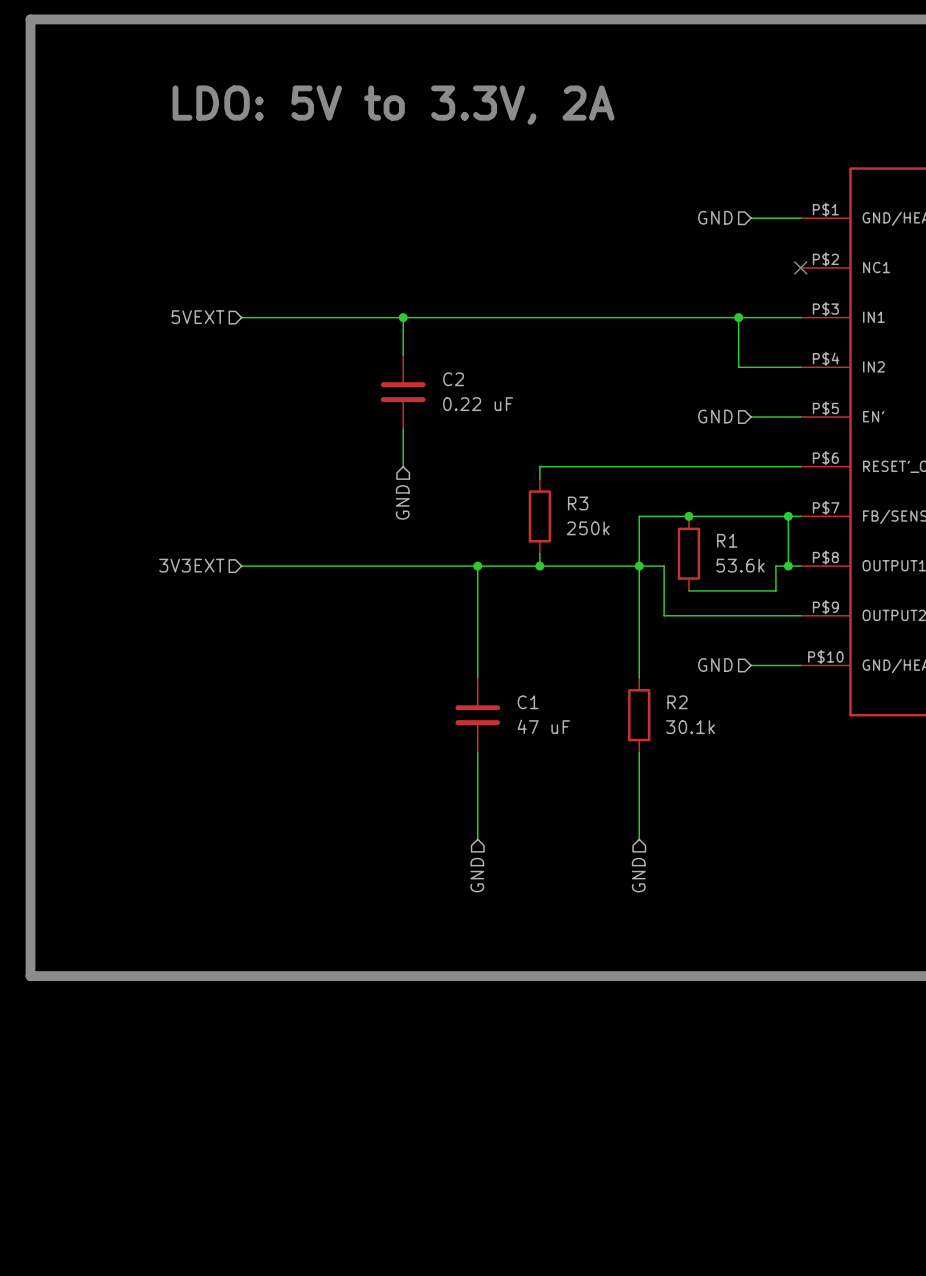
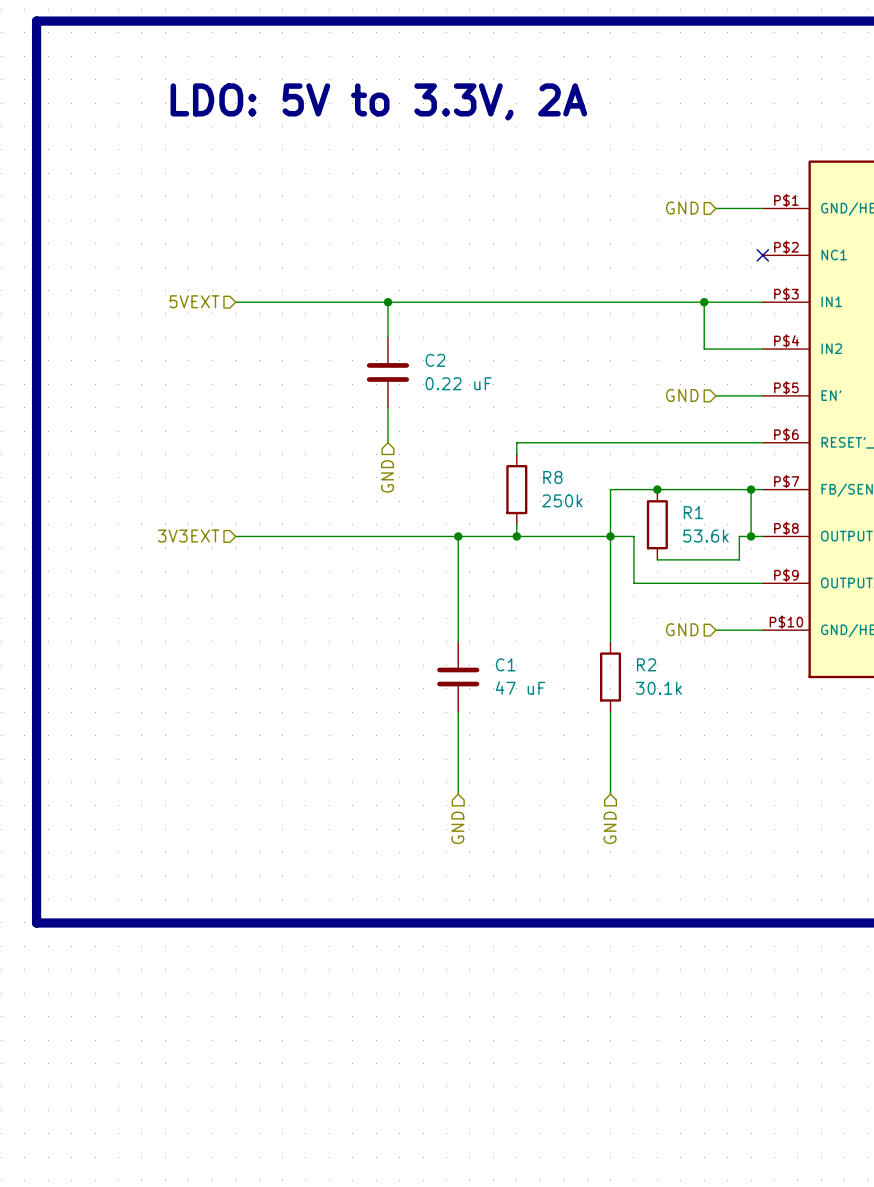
R3 name: R3 (578, 503) -> R8 (552, 477)

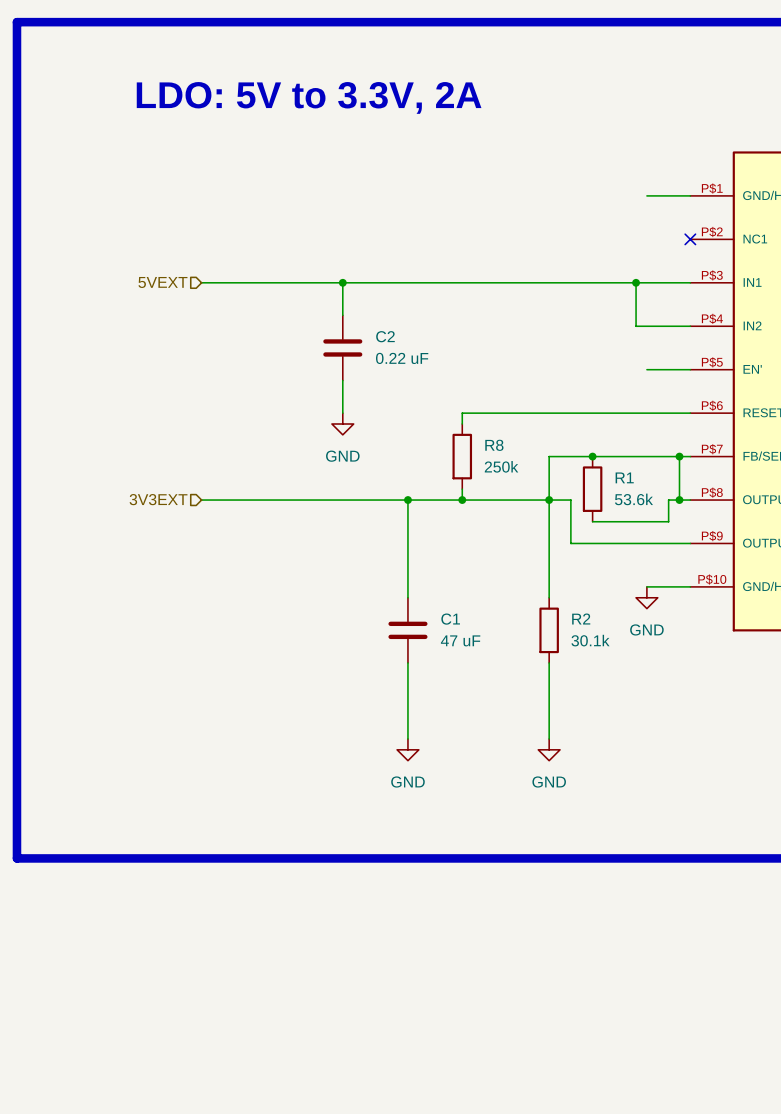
hierarchical label: GND (682, 208) -> none
hierarchical label: GND (682, 395) -> none
power symbol: none -> GND (342, 424)
hierarchical label: GND (387, 476) -> none
hierarchical label: GND (682, 629) -> none
power symbol: none -> GND (646, 597)
power symbol: none -> GND (407, 749)
power symbol: none -> GND (549, 749)
hierarchical label: GND (457, 827) -> none
hierarchical label: GND (610, 827) -> none

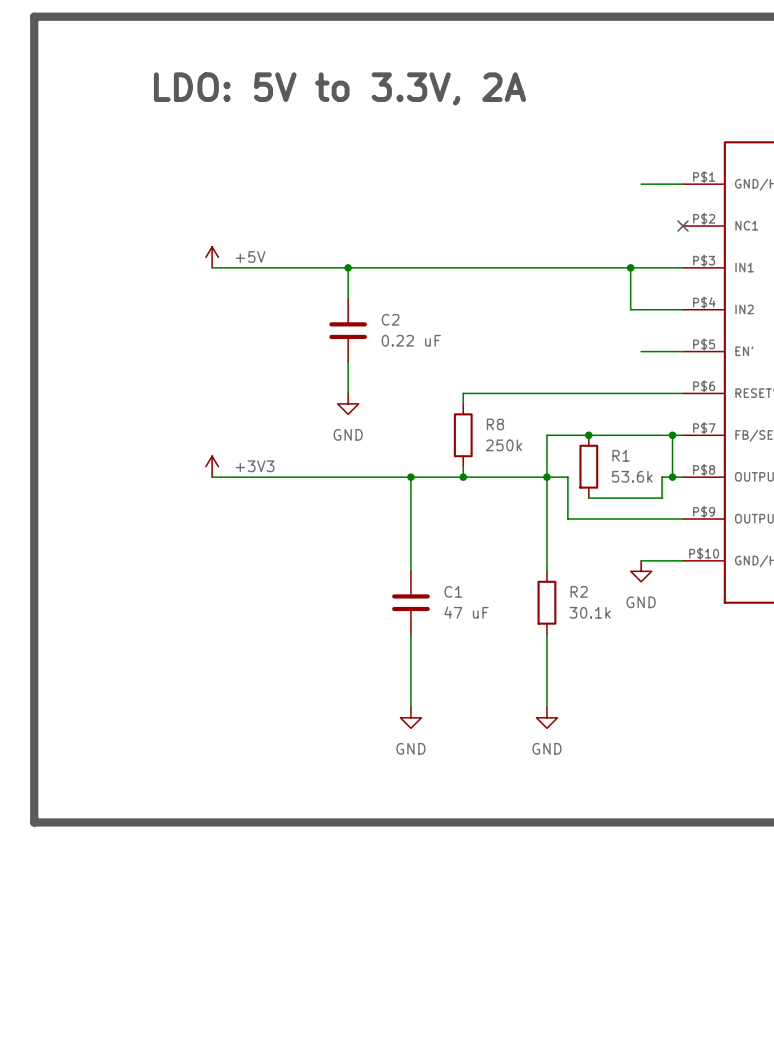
power symbol: none -> +5V (212, 257)
hierarchical label: 5VEXT (162, 282) -> none
power symbol: none -> +3V3 (212, 466)
hierarchical label: 3V3EXT (158, 499) -> none

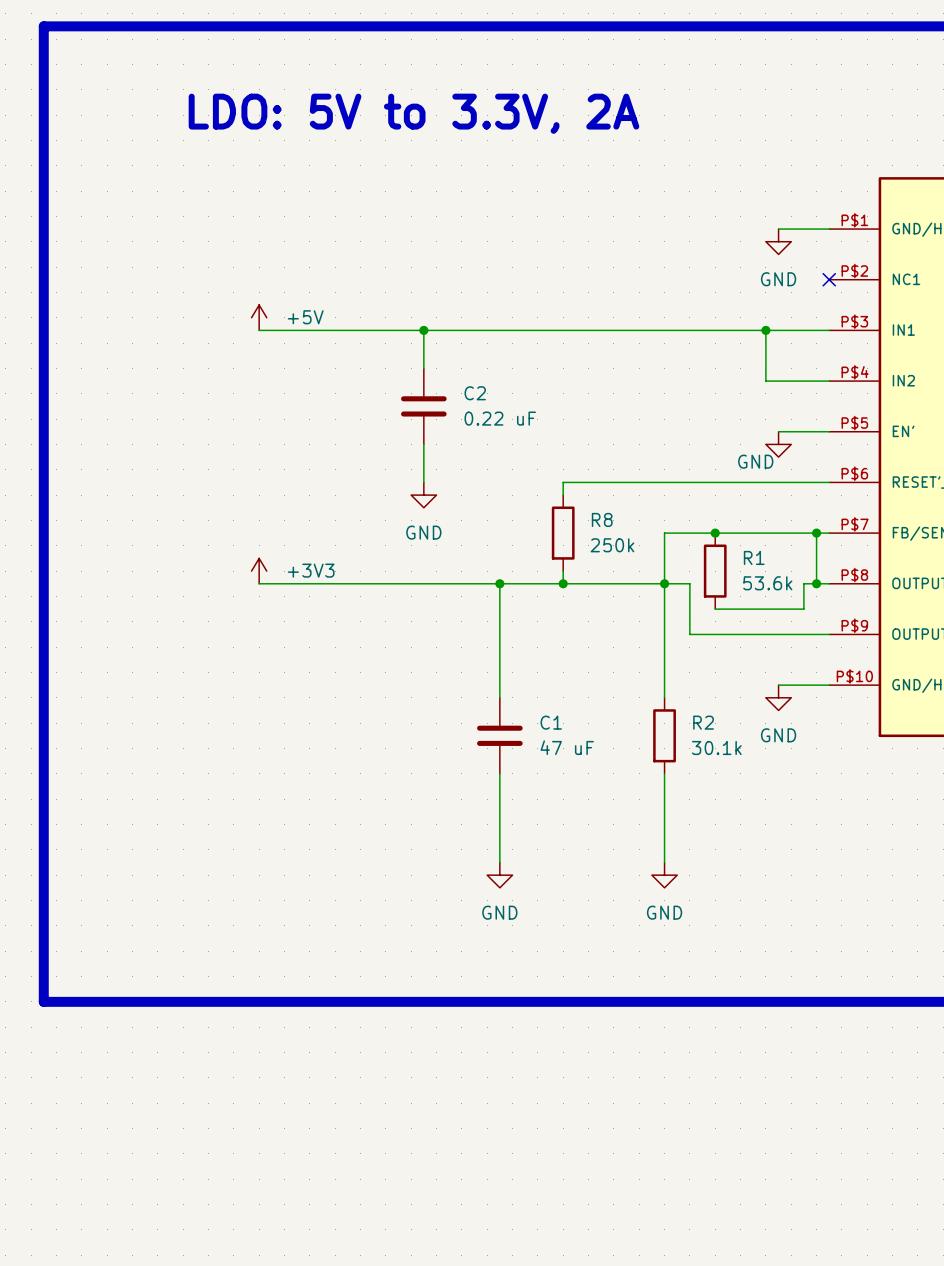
power symbol: none -> GND (778, 241)
power symbol: none -> GND (778, 444)

